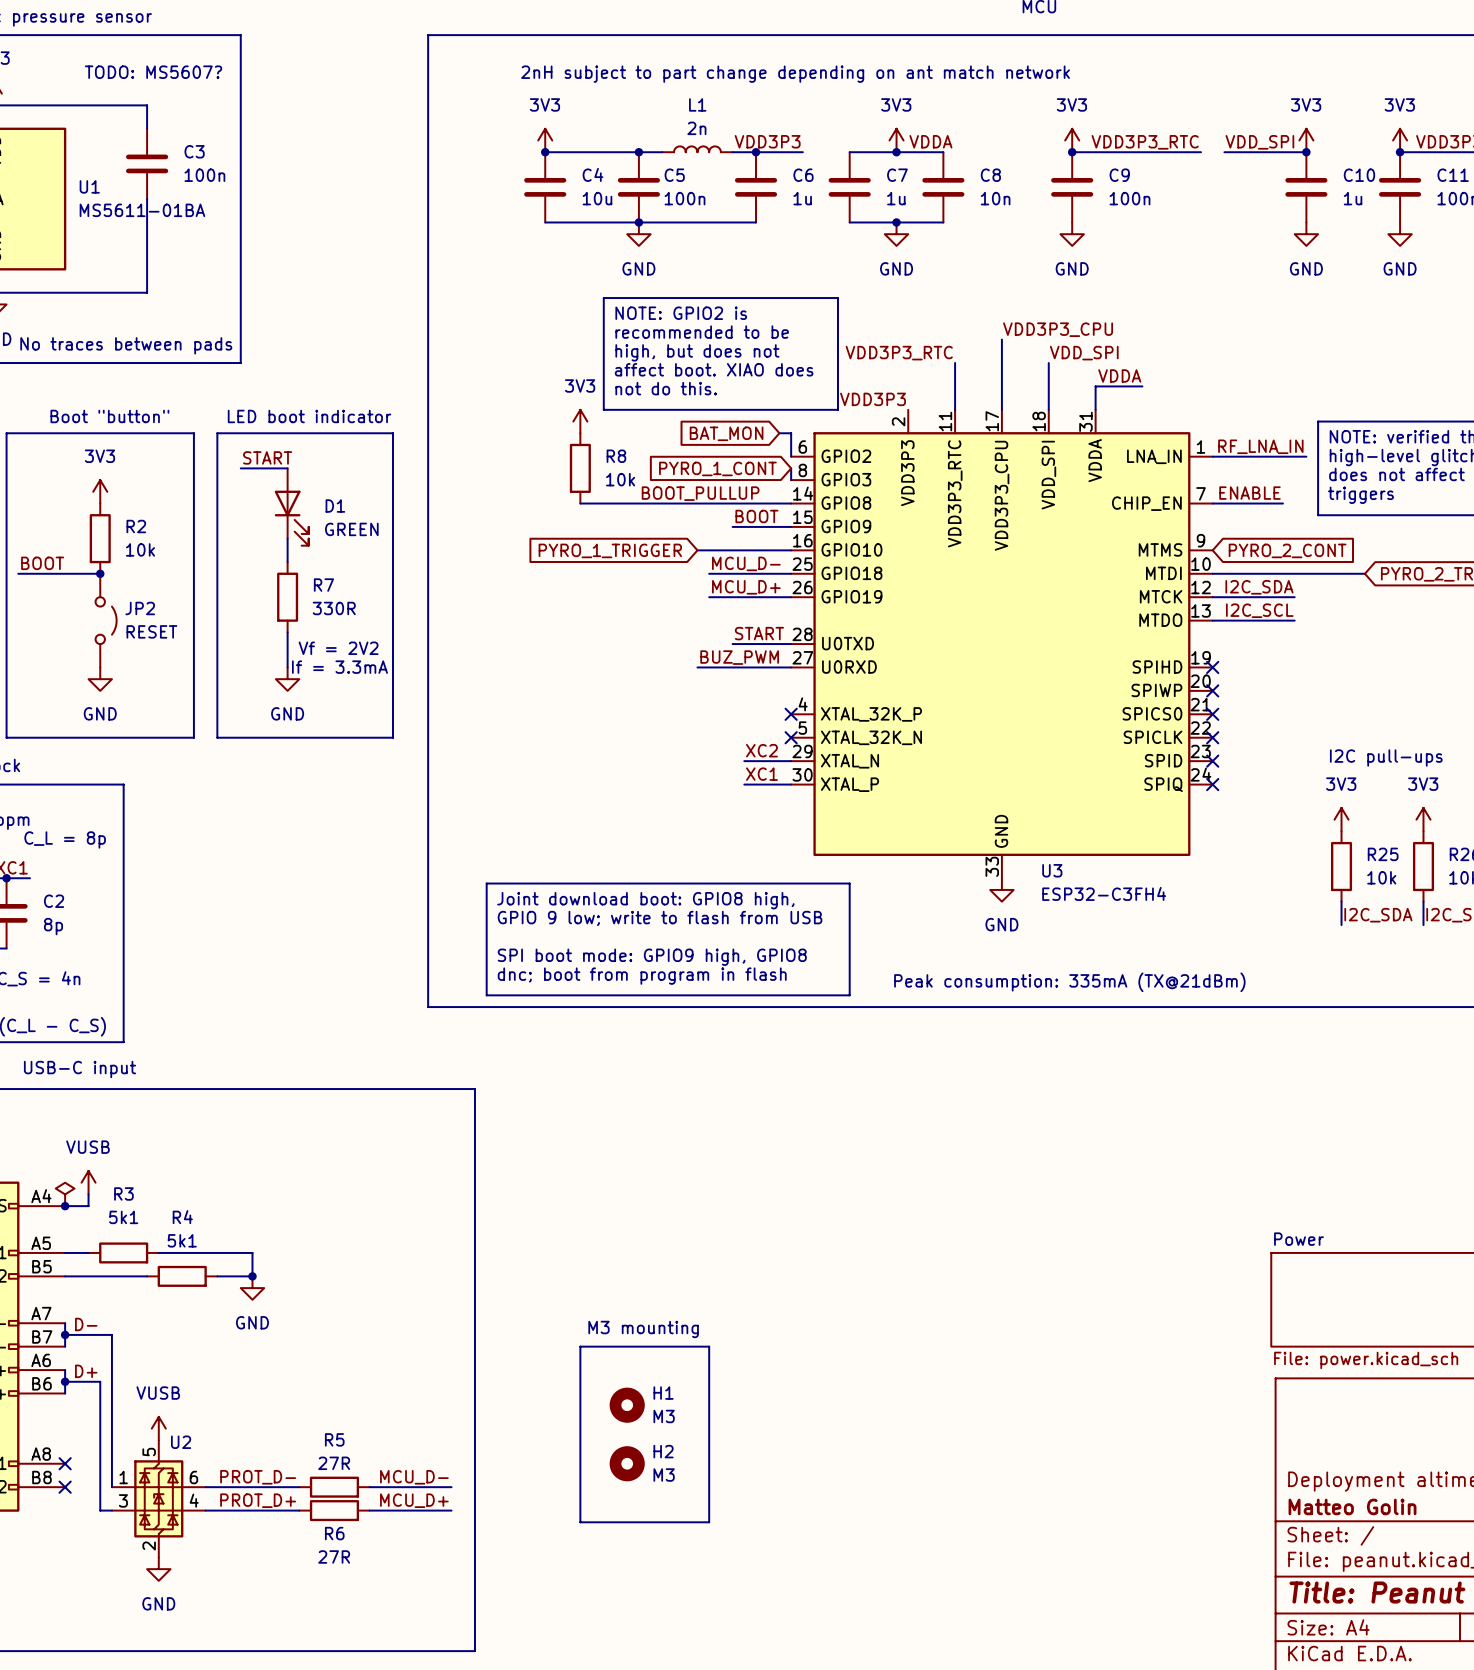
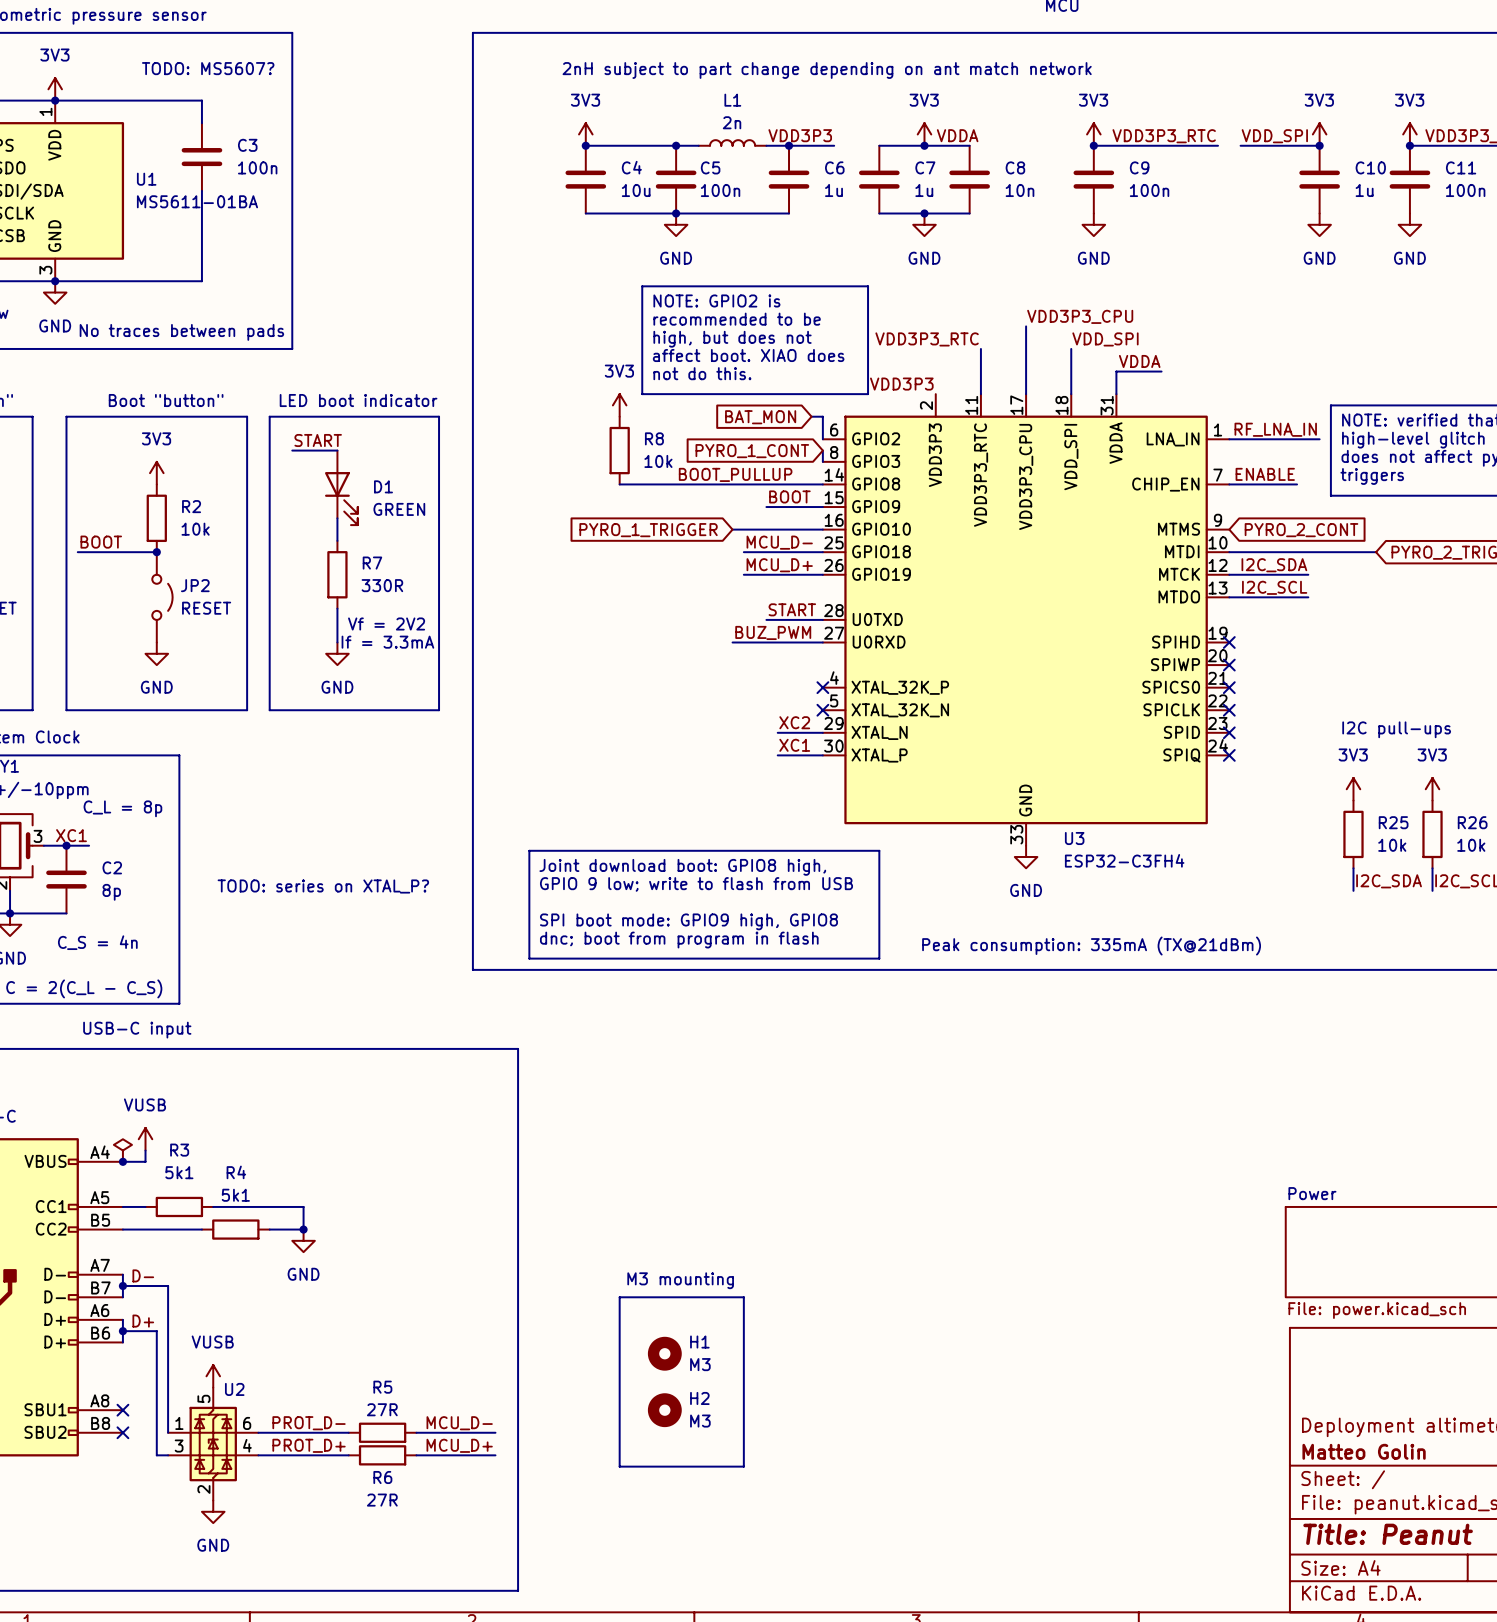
text: none -> TODO: series on XTAL_P? (323, 886)

